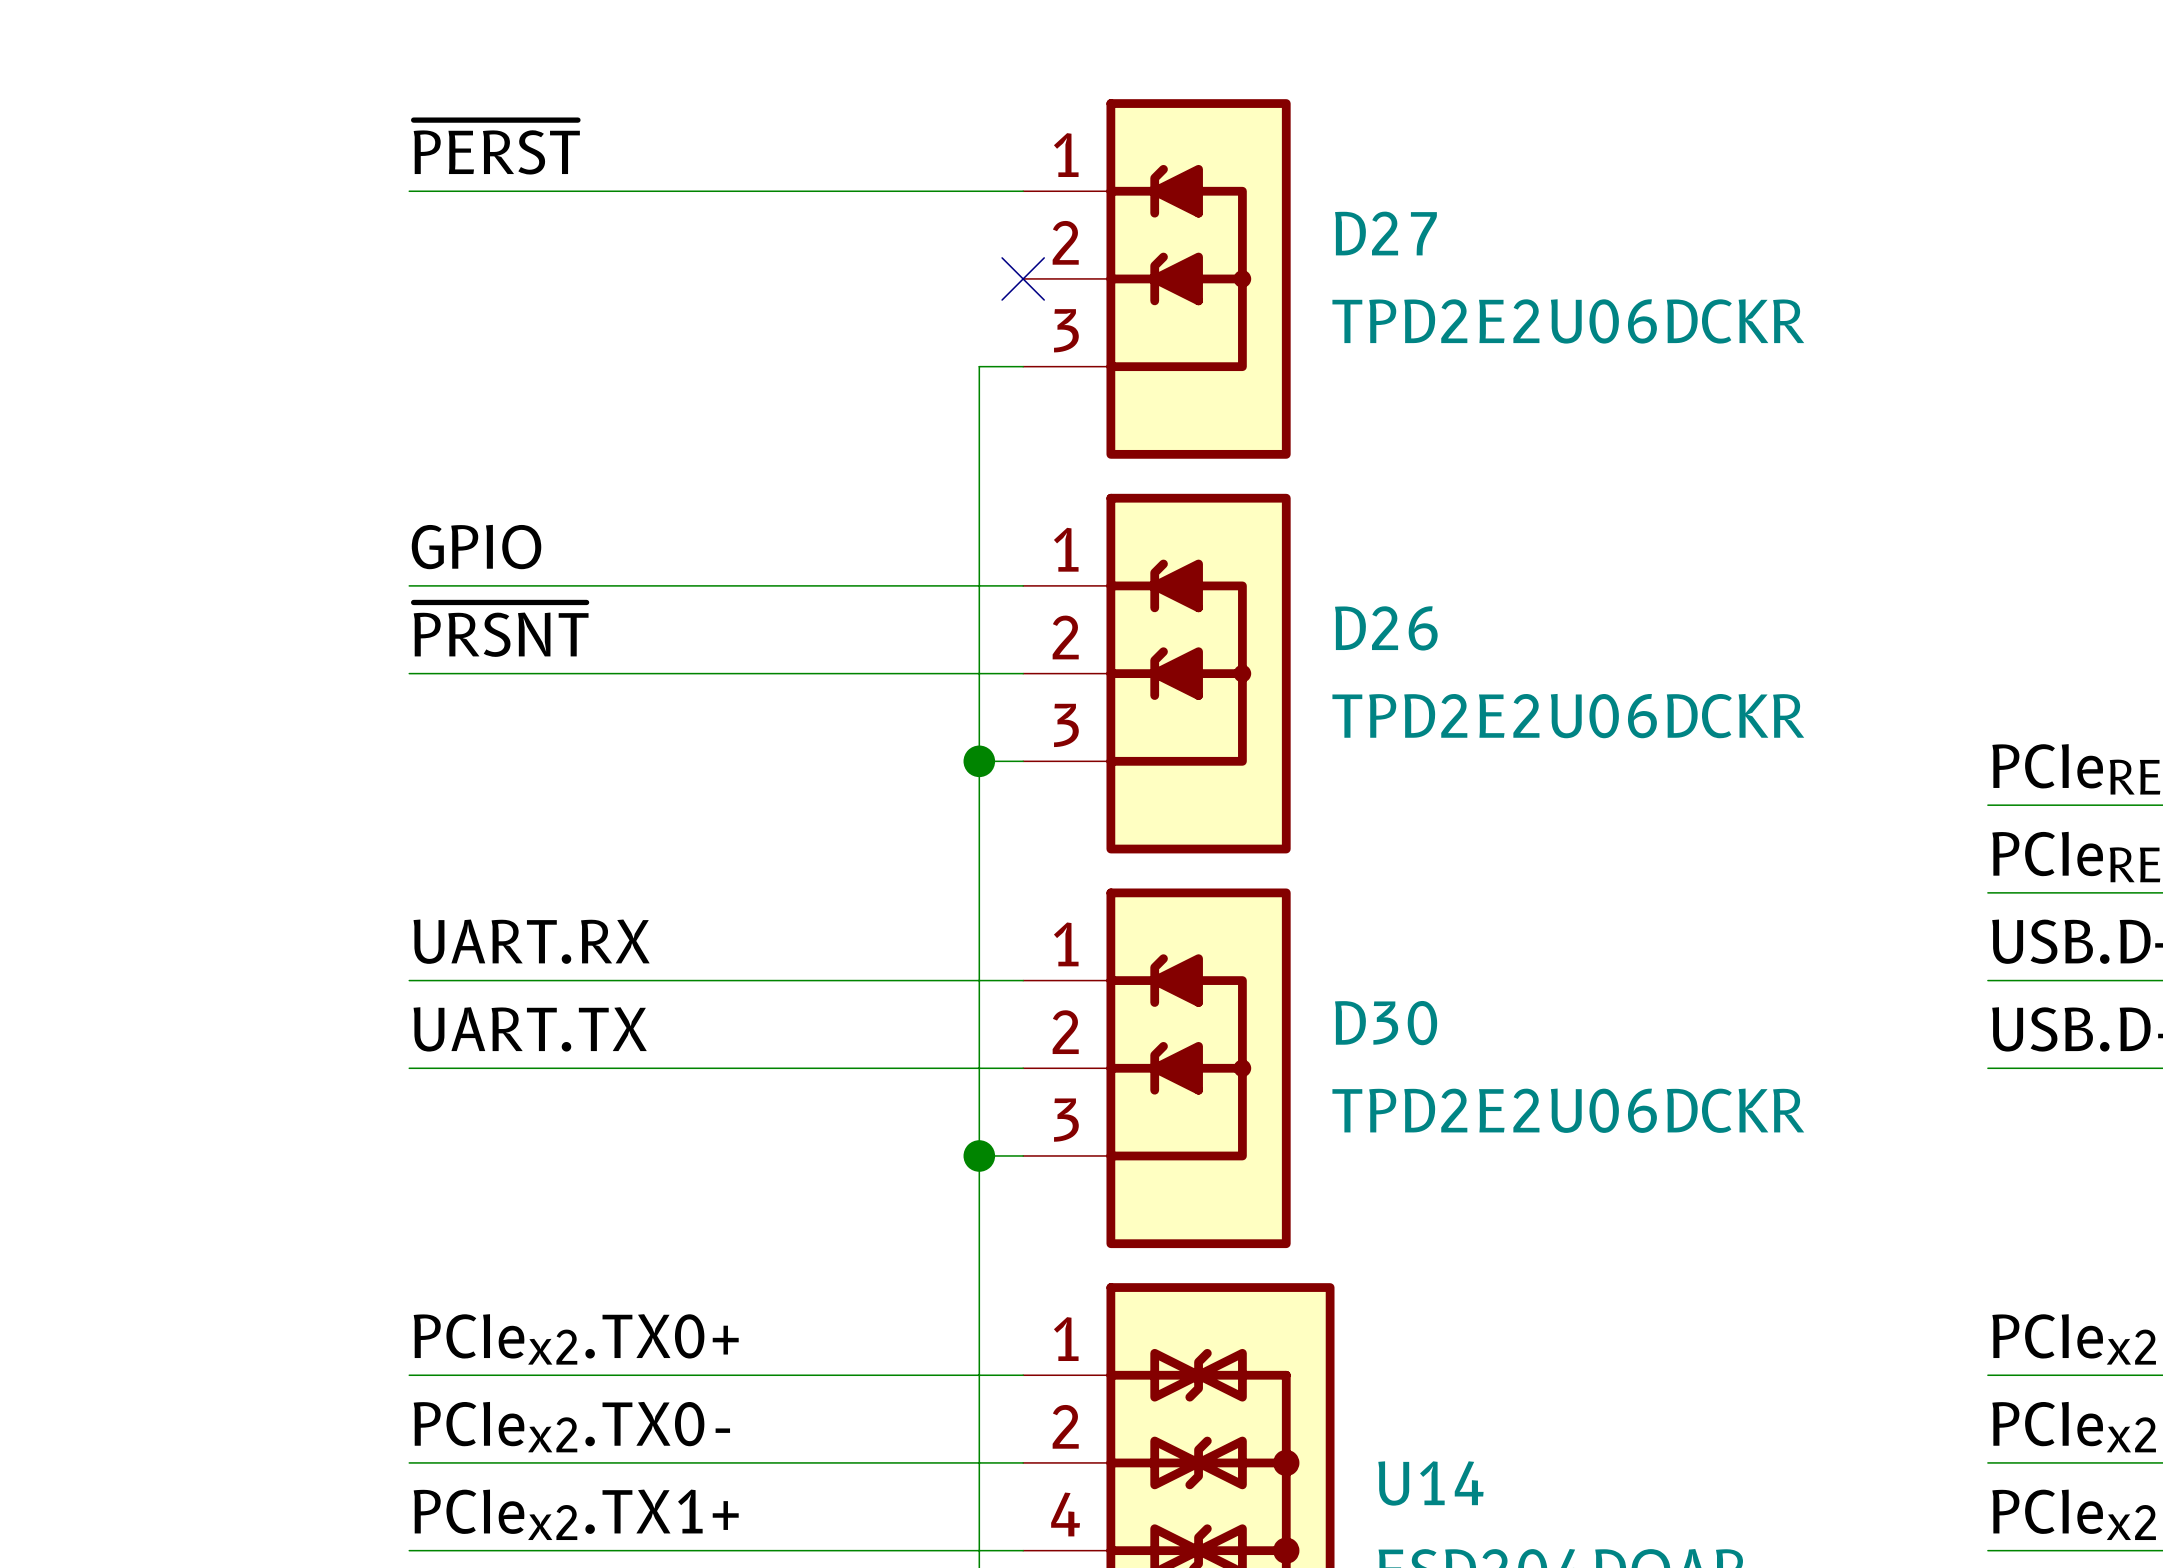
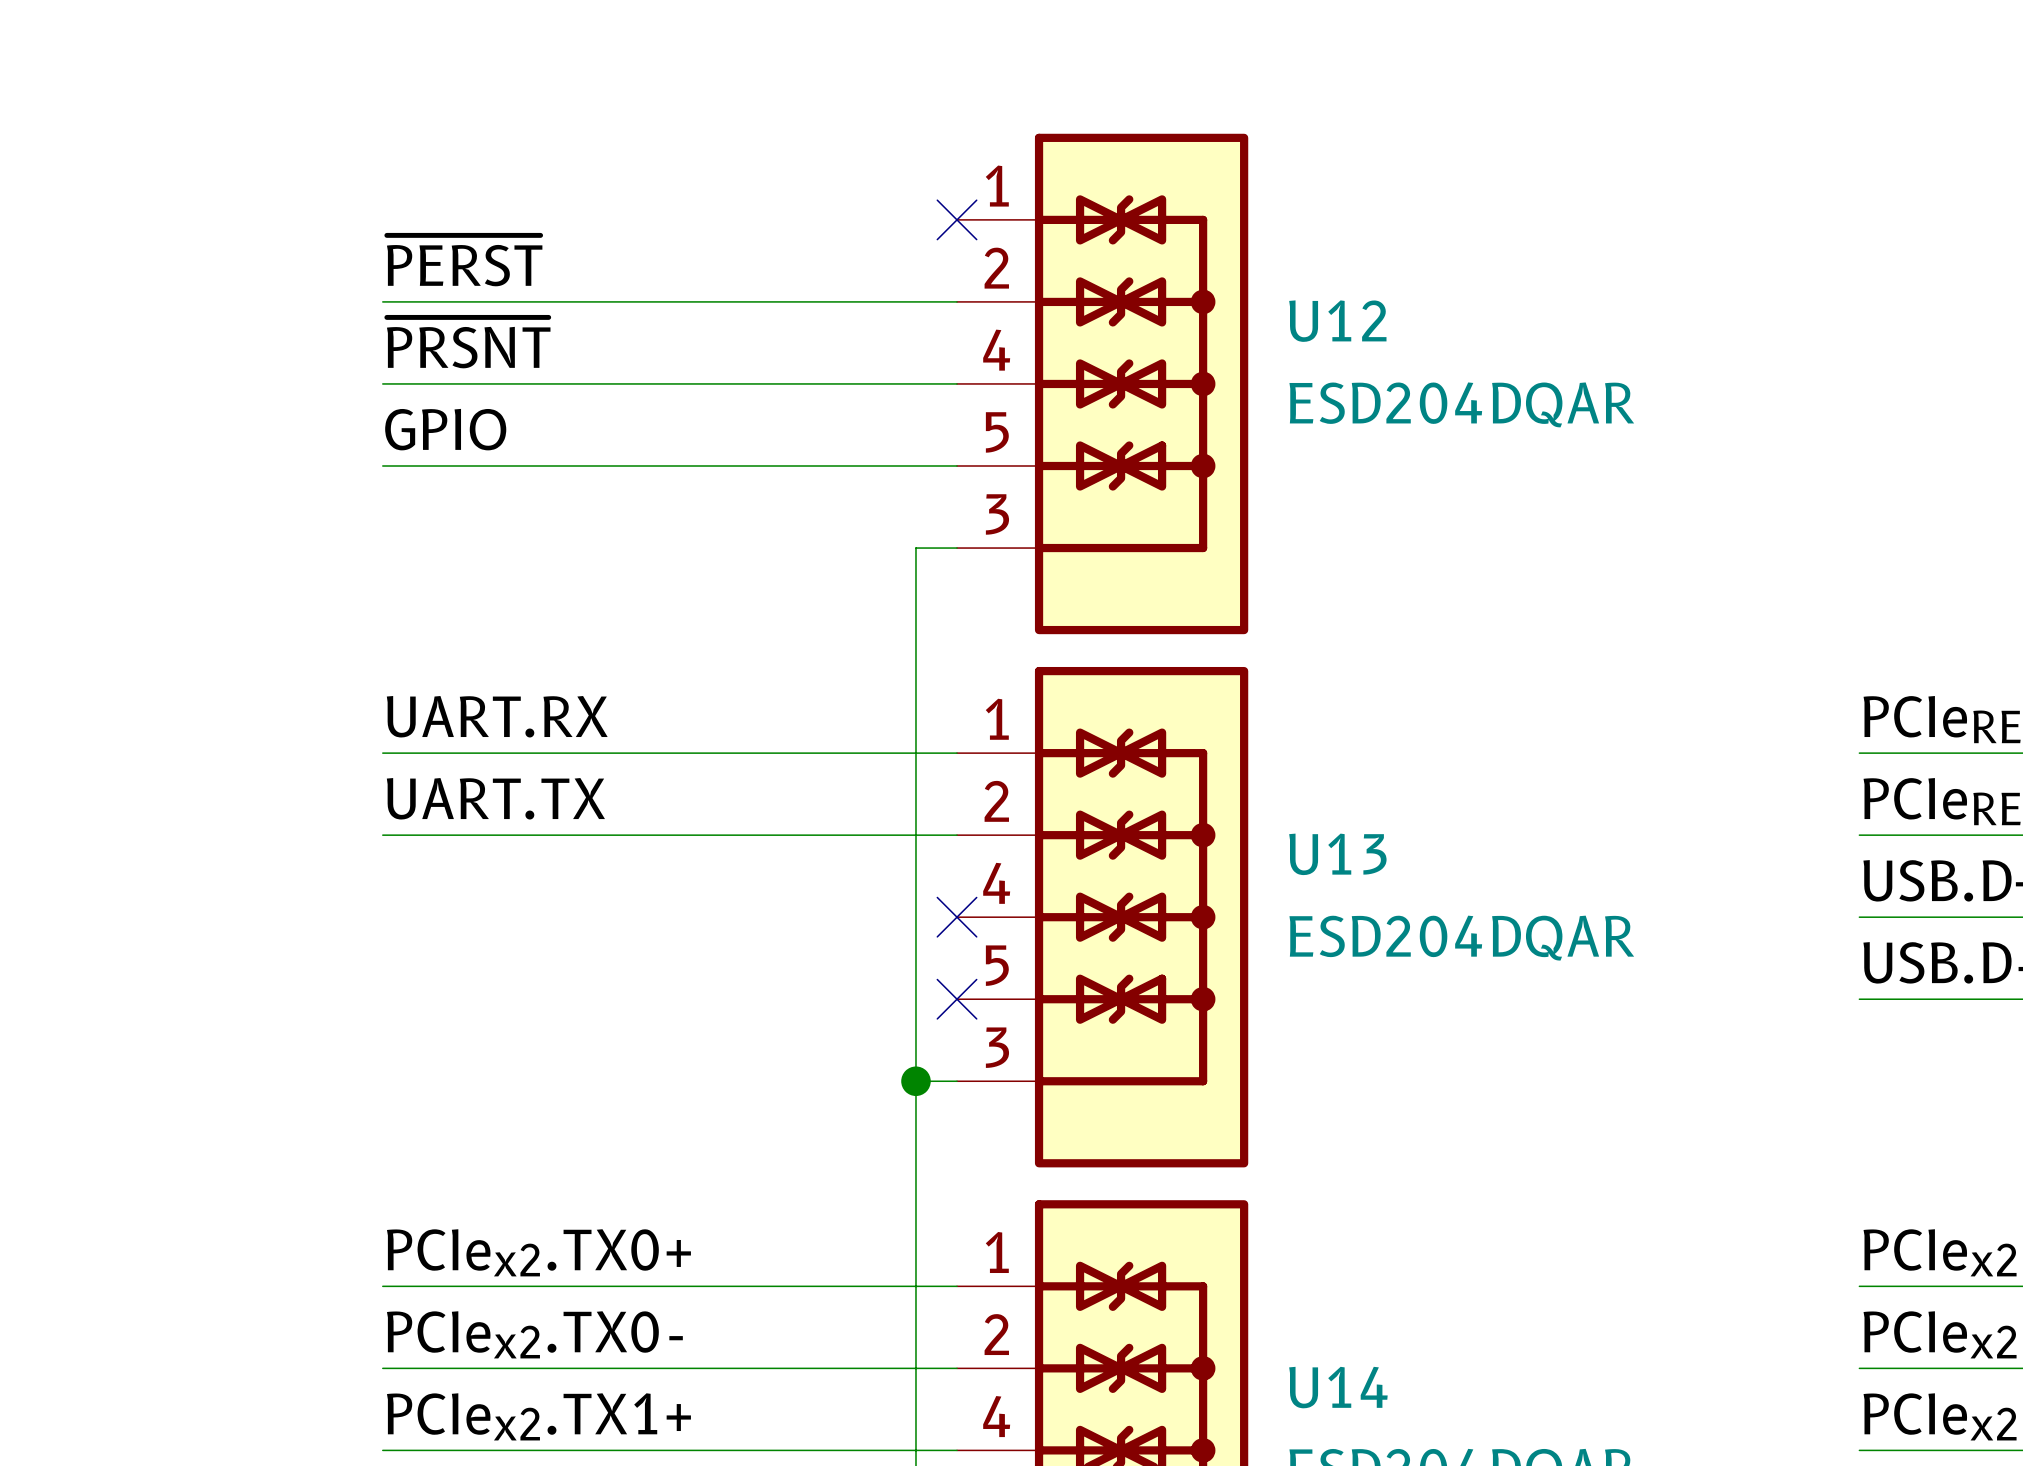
label position: ~{PERST} (496, 147) -> ~{PERST} (464, 260)
wire: (409, 191) (1023, 191) -> (382, 301) (957, 301)
no-connect mark position: (1023, 278) -> (957, 219)
D27: (1156, 278) -> none
wire: (1023, 366) (979, 366) (979, 585) (409, 585) -> none
wire: none -> (382, 383) (957, 383)
U12: none -> (1102, 383)
label position: GPIO (476, 547) -> GPIO (445, 429)
label position: ~{PRSNT} (501, 629) -> ~{PRSNT} (468, 342)
wire: (409, 673) (1023, 673) -> (382, 466) (957, 466)
D26: (1156, 673) -> none
wire: (979, 761) (1023, 761) -> none
junction: (979, 761) -> none
label position: UART.RX (531, 941) -> UART.RX (497, 716)
wire: (409, 980) (1023, 980) -> (382, 753) (957, 753)
no-connect mark: none -> (957, 917)
U13: none -> (1102, 917)
label position: UART.TX (530, 1029) -> UART.TX (495, 798)
wire: (409, 1068) (1023, 1068) -> (382, 835) (957, 835)
no-connect mark: none -> (957, 999)
D30: (1156, 1068) -> none

